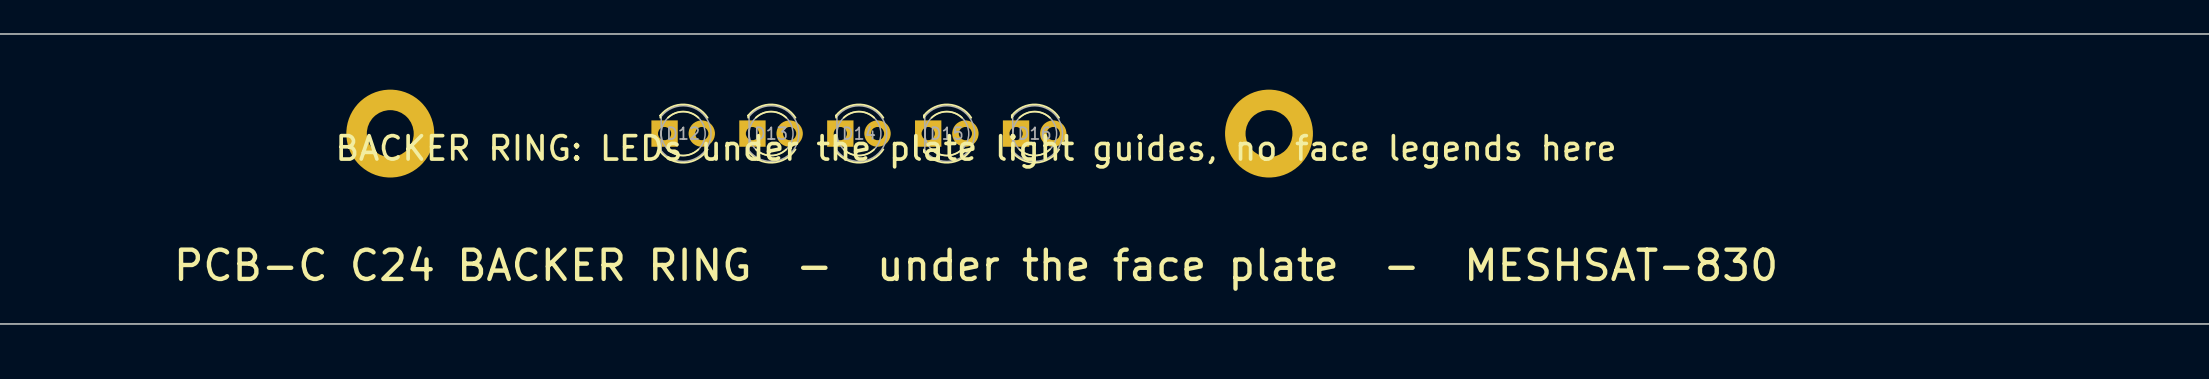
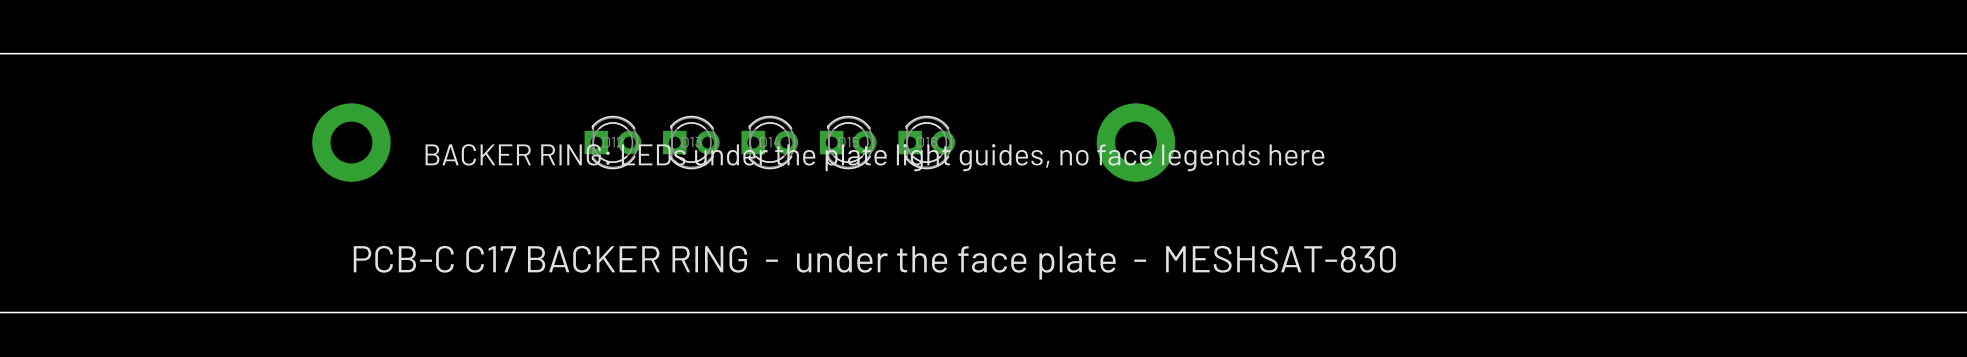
text: PCB-C C24 BACKER RING - under the face plate - MESHSAT-830 (976, 268) -> PCB-C C17 BACKER RING - under the face plate - MESHSAT-830 (874, 262)

